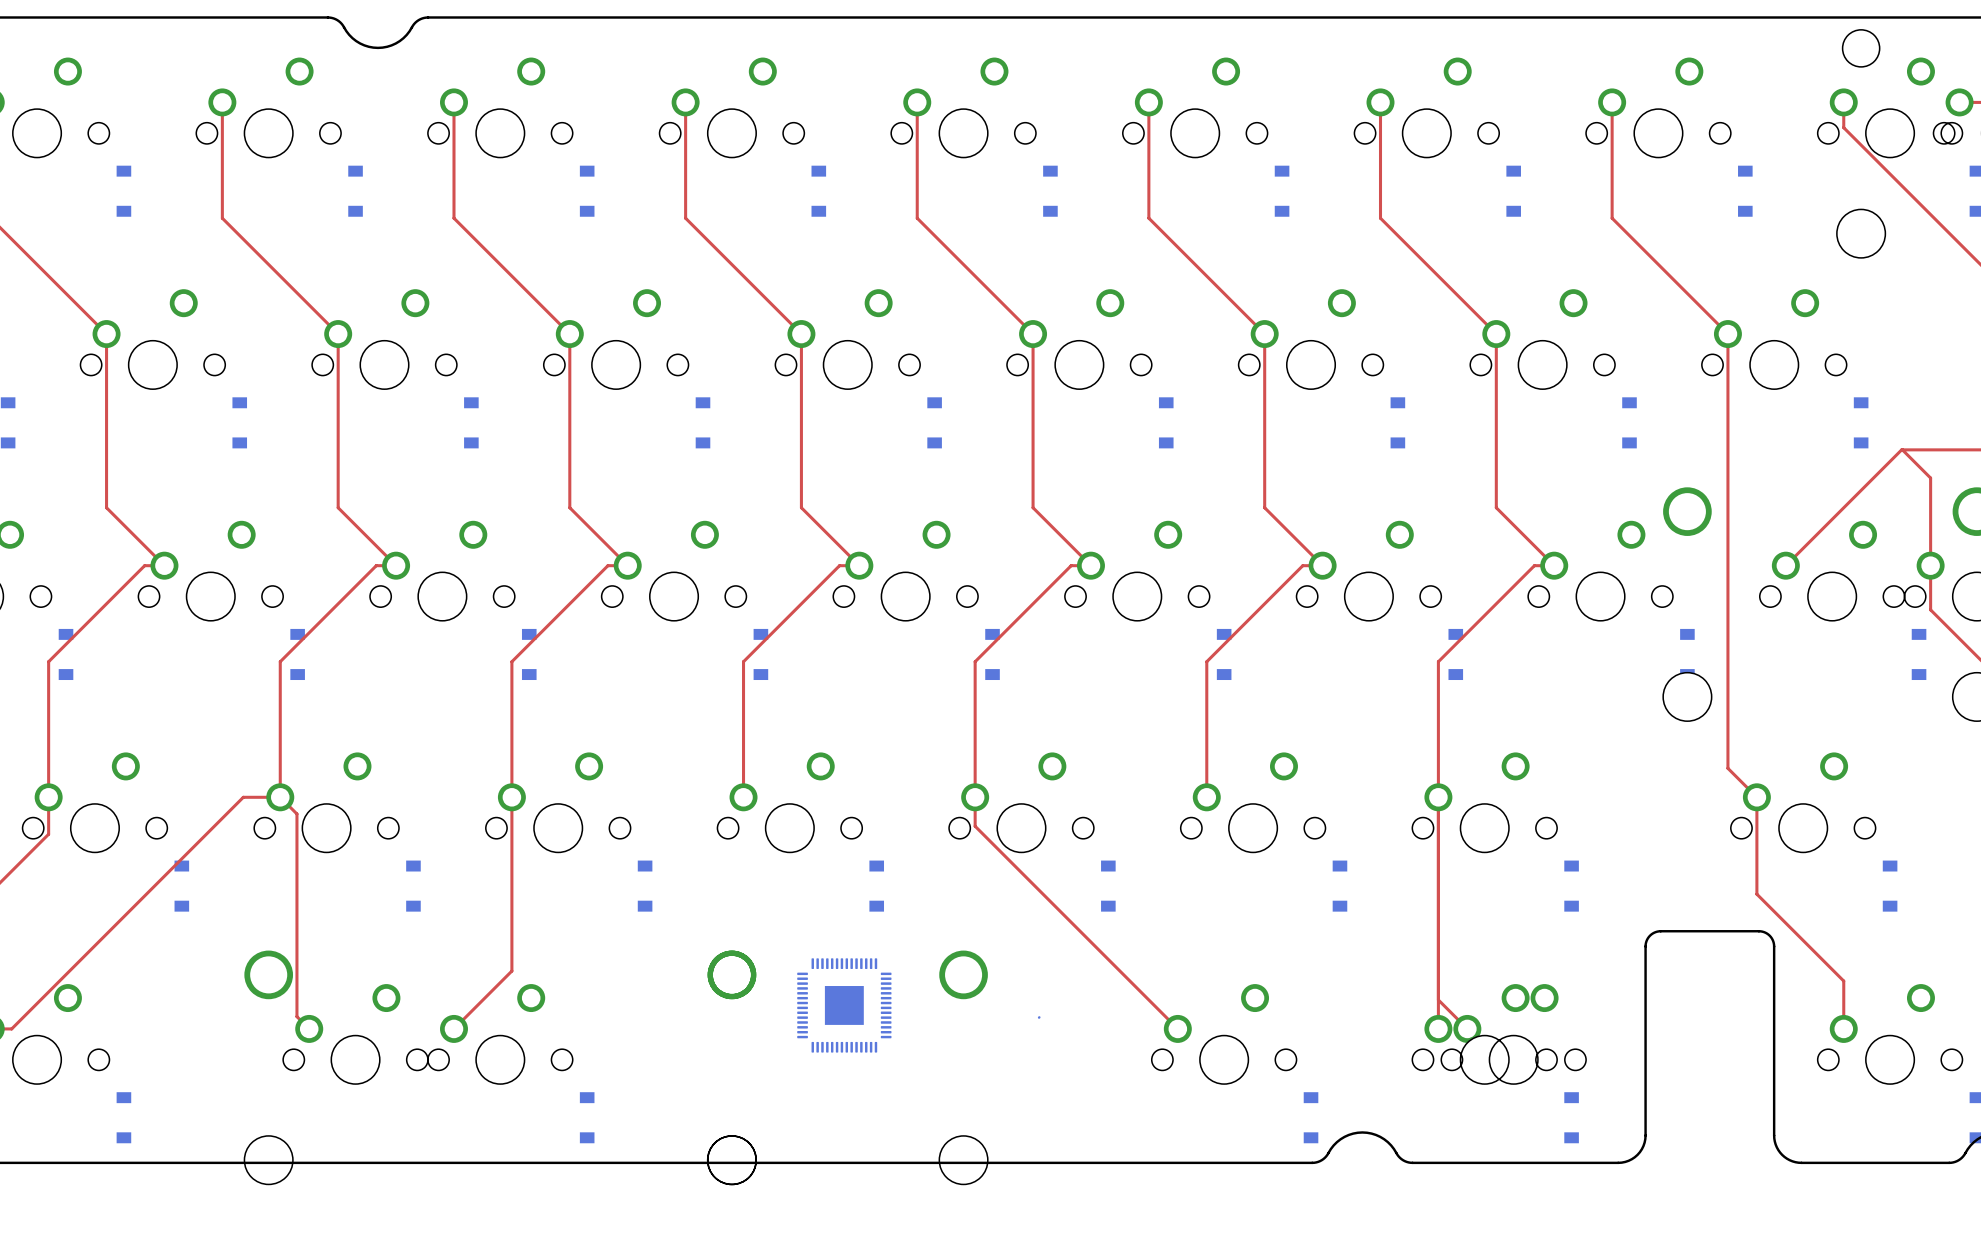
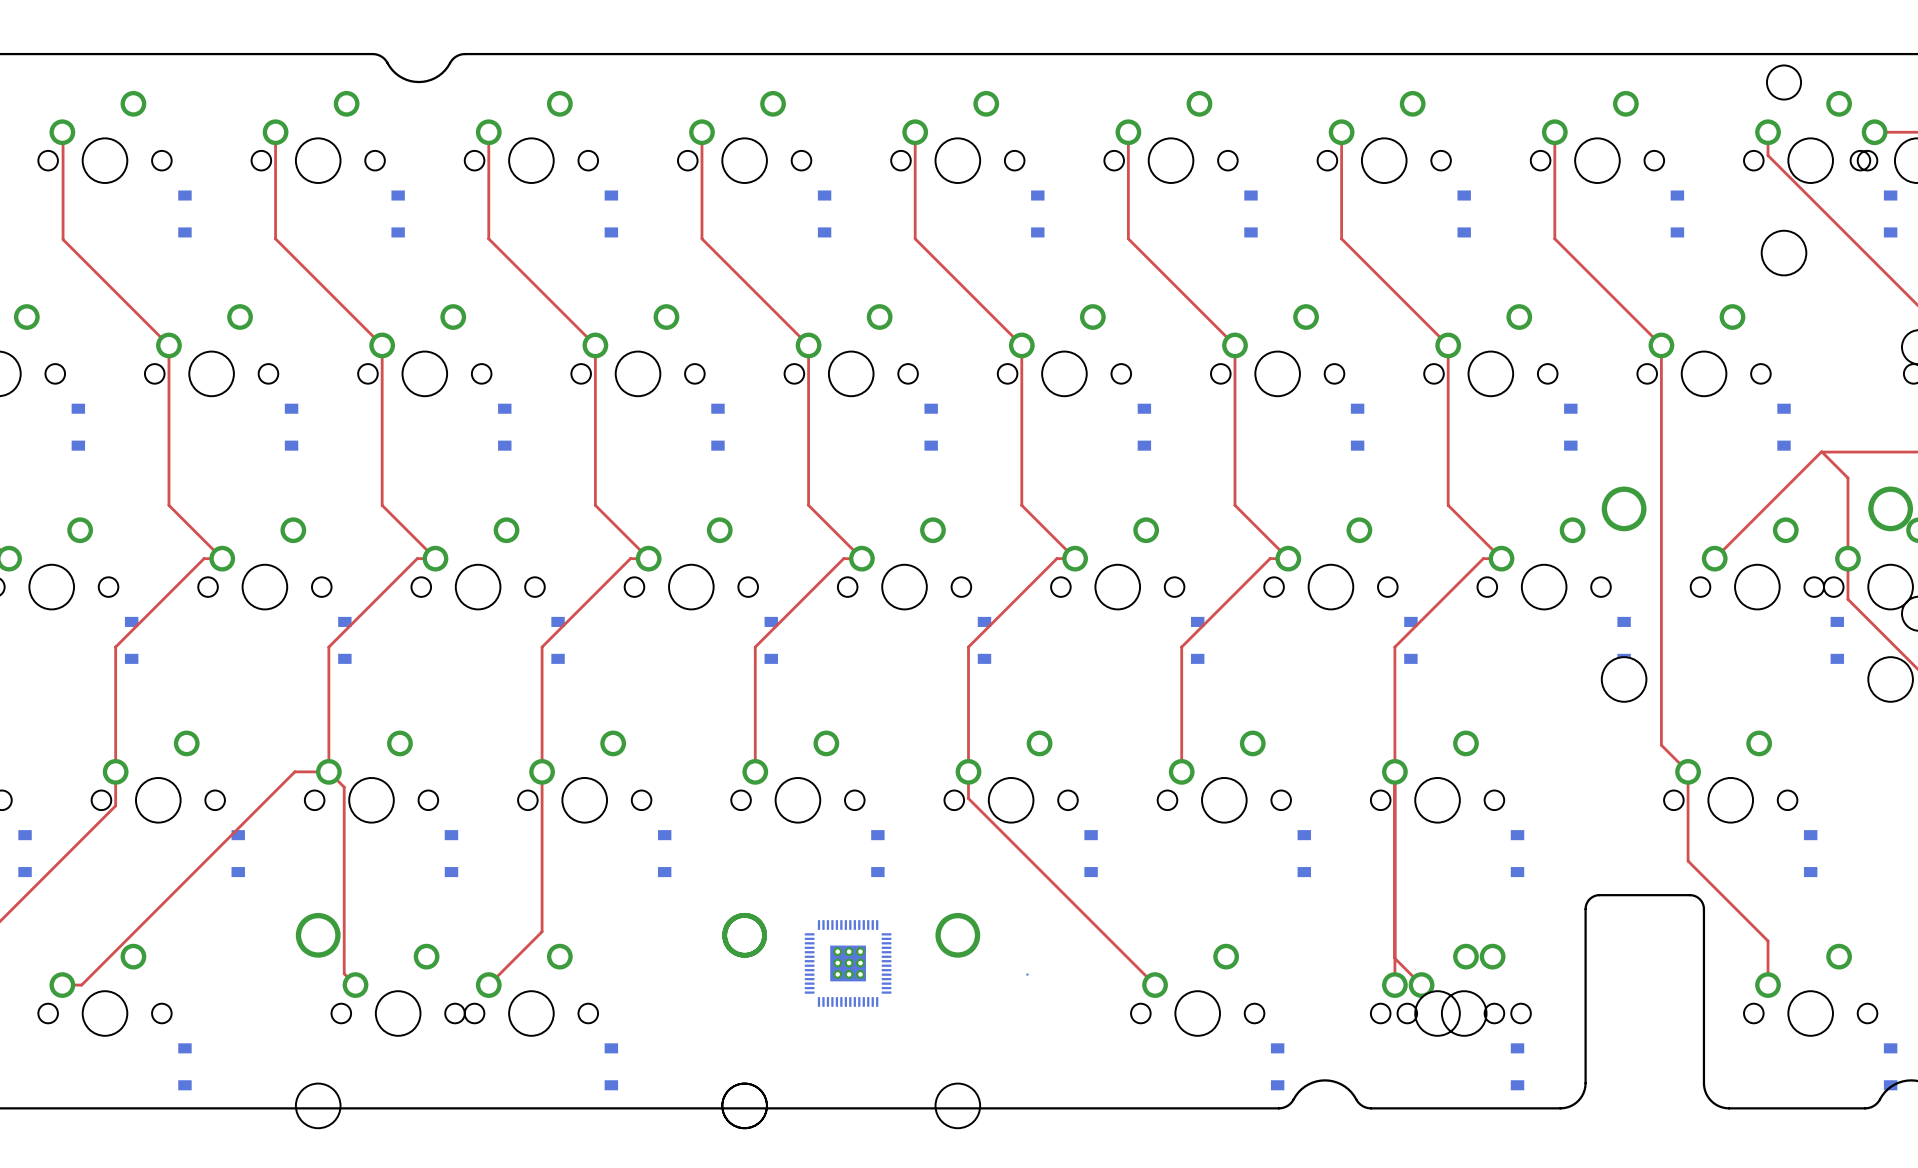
via: none -> (837, 951)
via: none -> (849, 951)
via: none -> (860, 951)
via: none -> (837, 963)
via: none -> (849, 963)
via: none -> (860, 963)
via: none -> (837, 974)
via: none -> (849, 974)
via: none -> (860, 974)

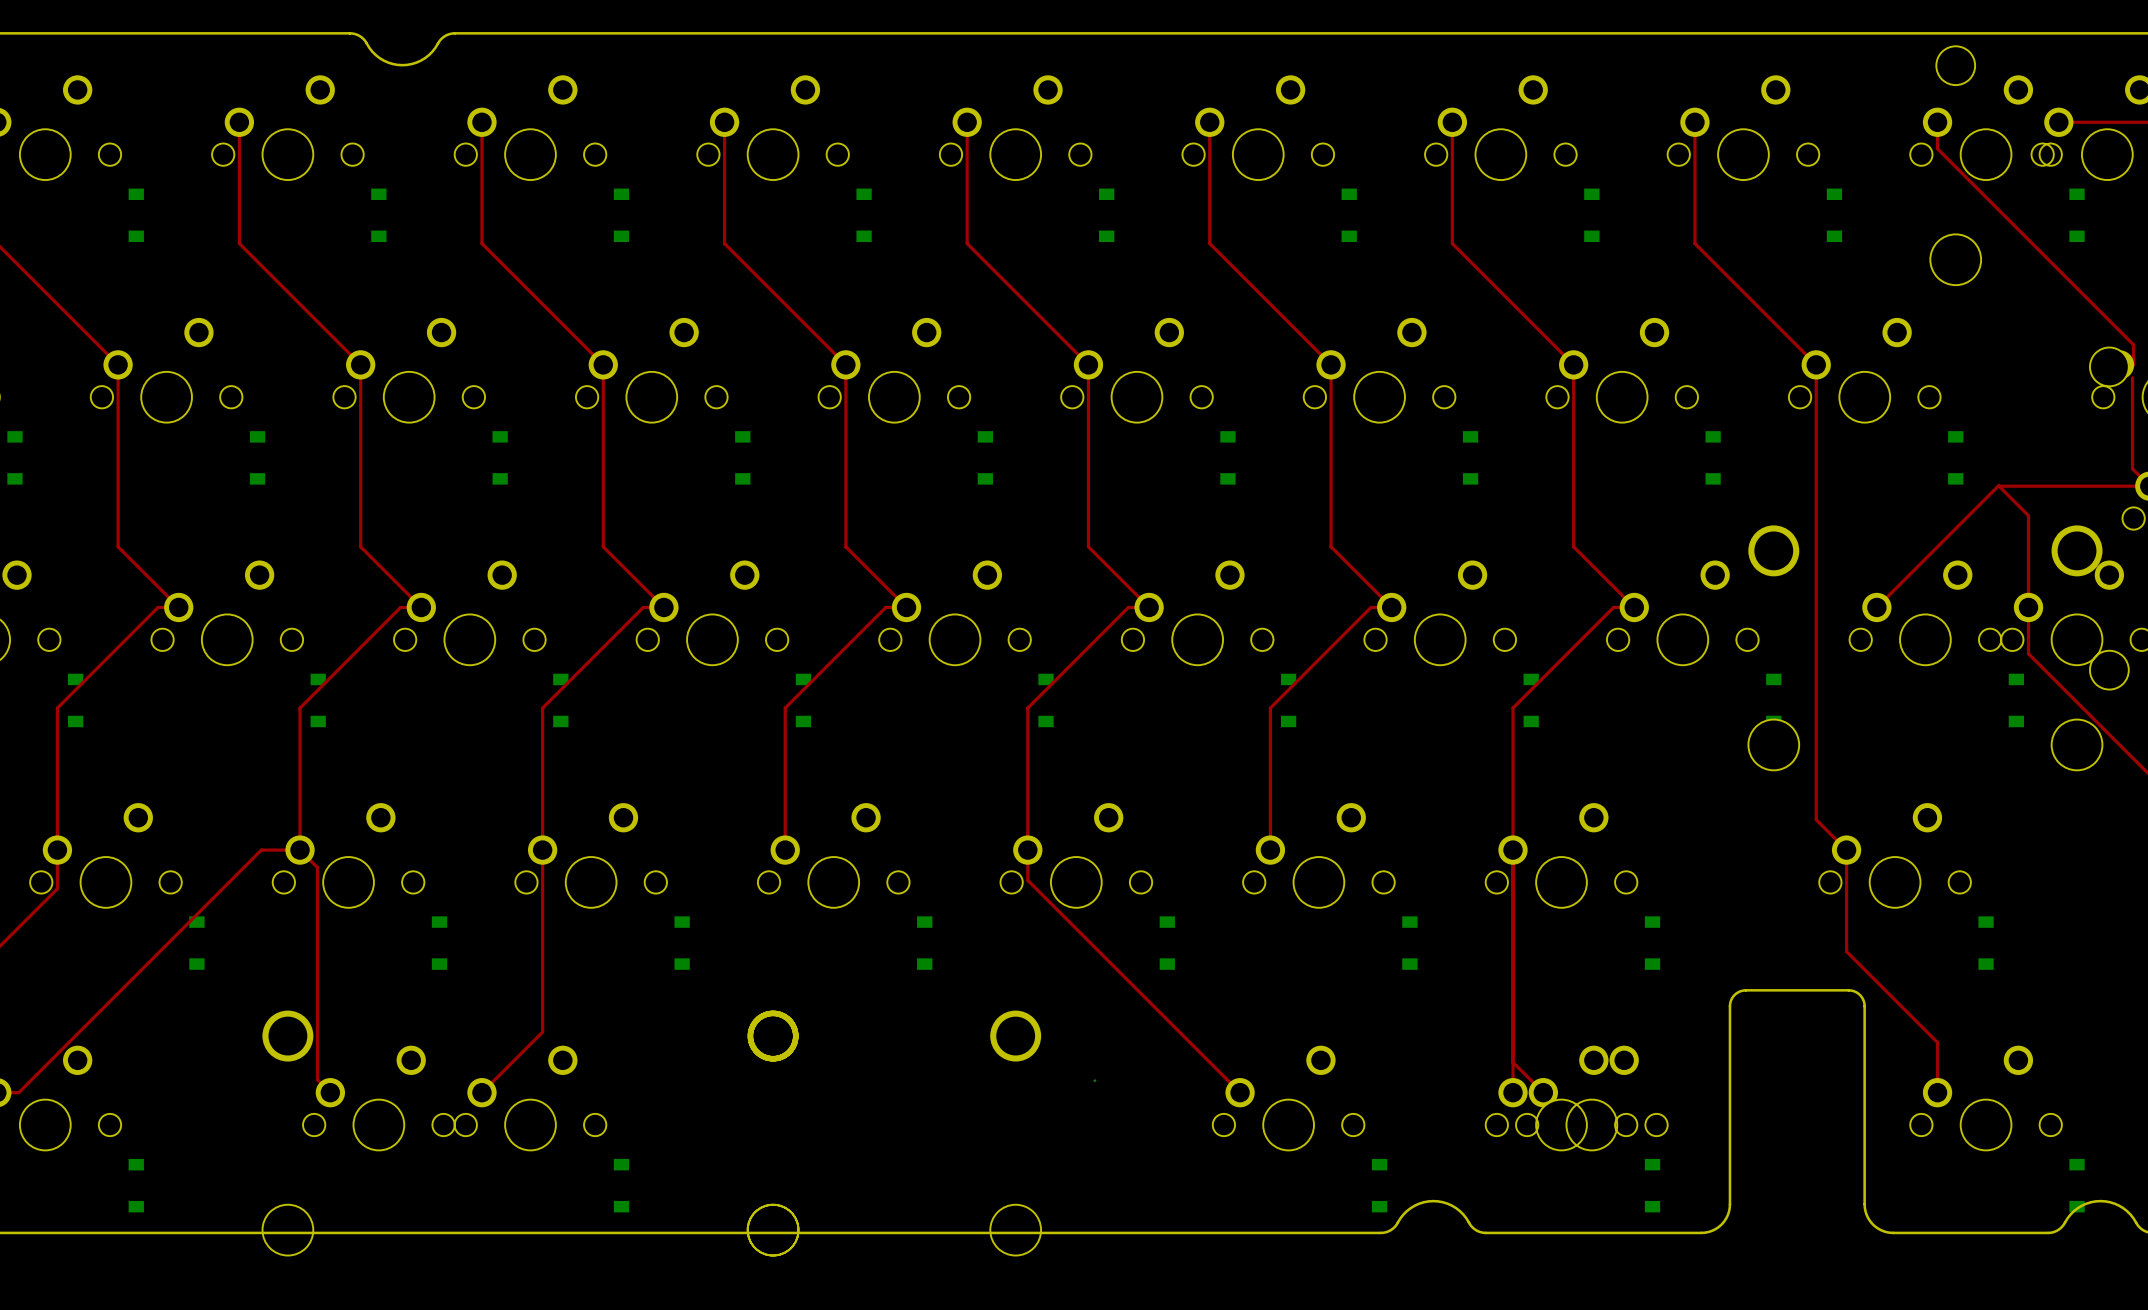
via: (837, 951) -> none
via: (849, 951) -> none
via: (860, 951) -> none
via: (837, 963) -> none
part: (848, 963) -> none
via: (849, 963) -> none
via: (860, 963) -> none
via: (837, 974) -> none
via: (849, 974) -> none
via: (860, 974) -> none

